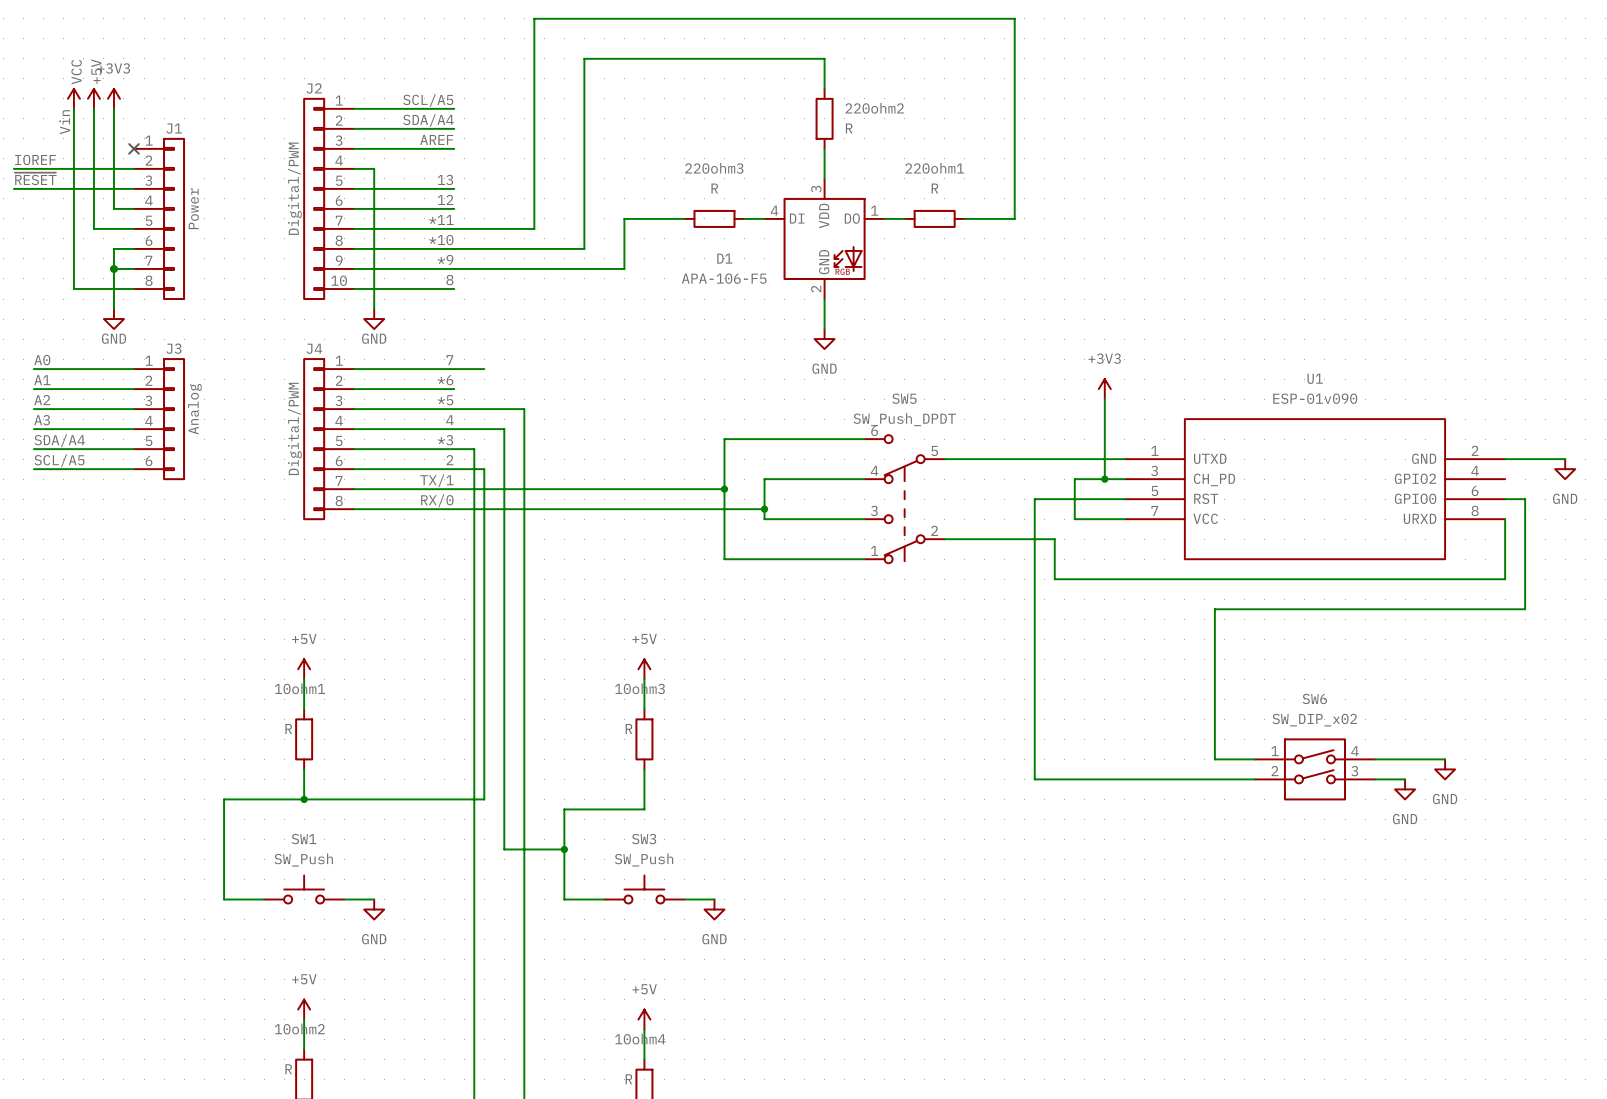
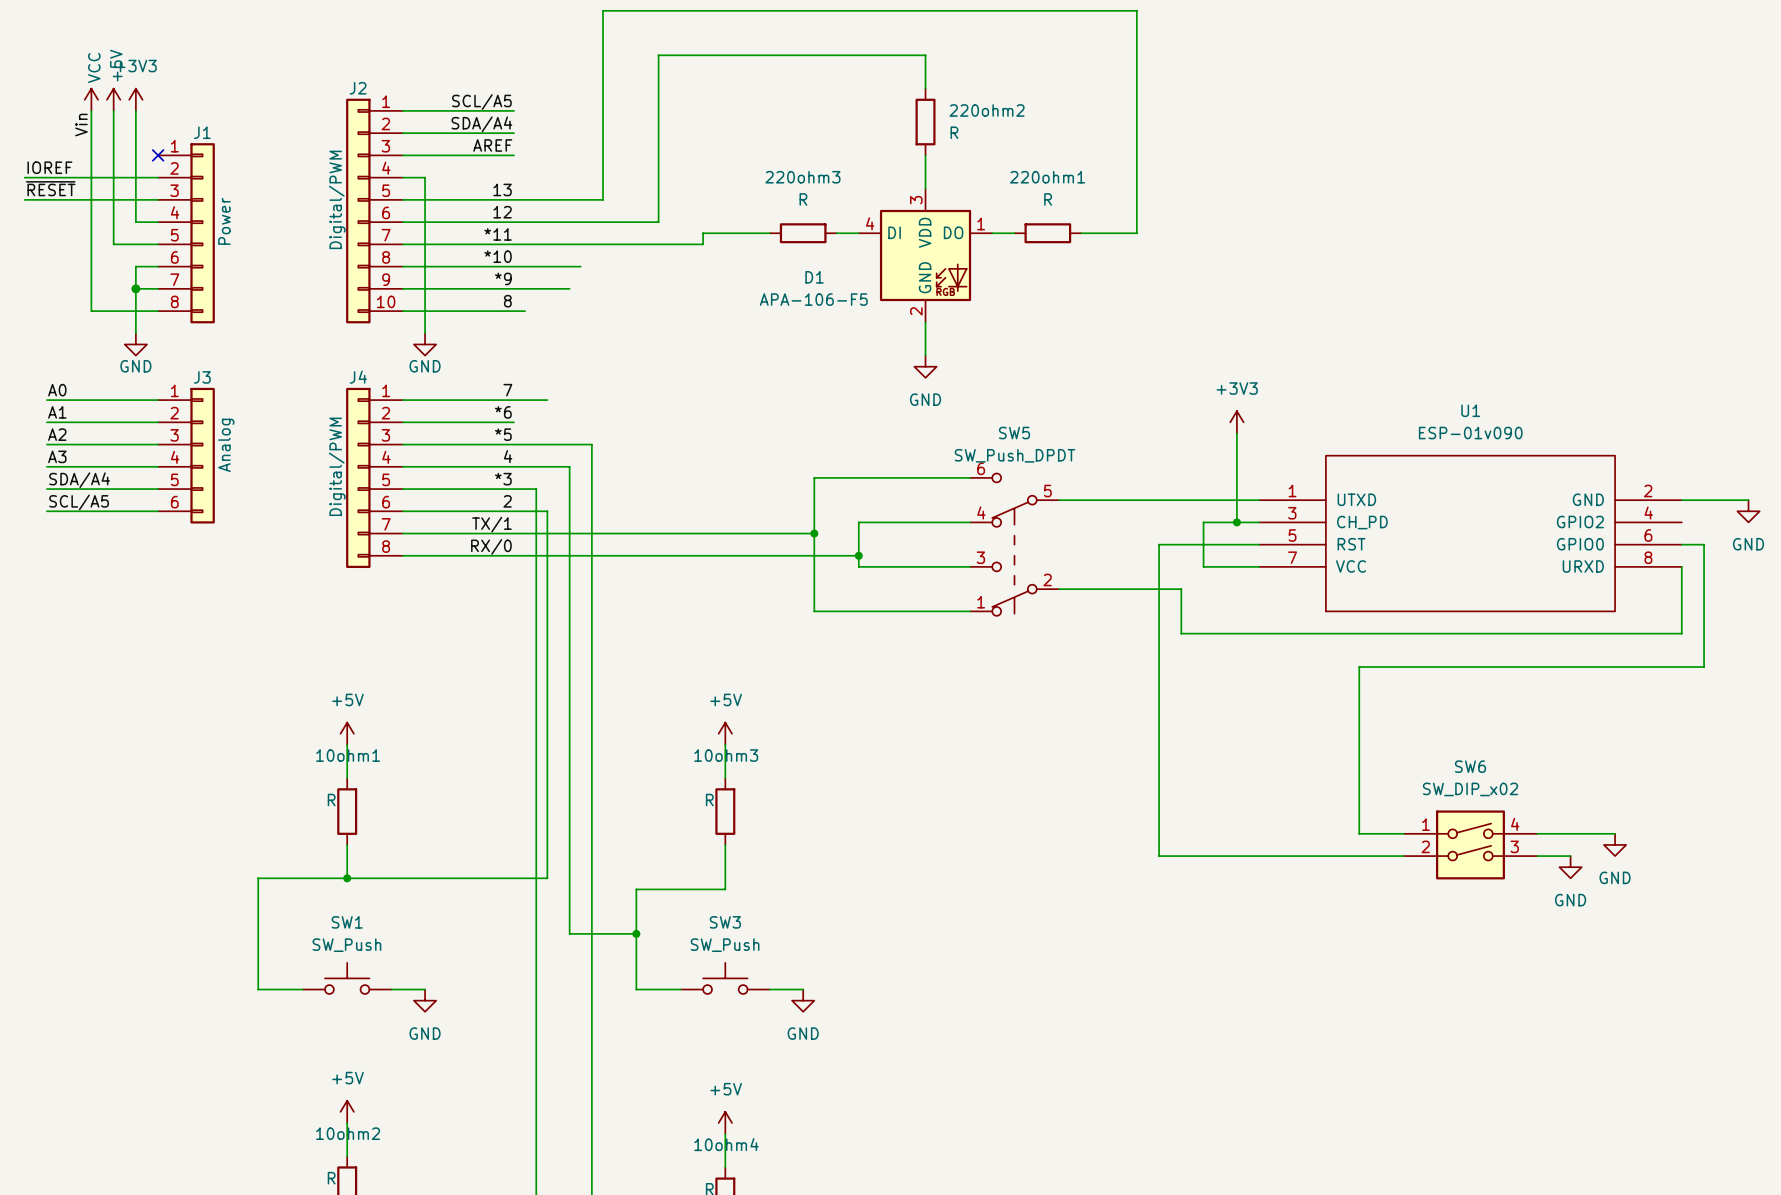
wire: (534, 188) (534, 228) -> (602, 199) (514, 199)
wire: (584, 208) (584, 248) (514, 248) -> (658, 222) (514, 222)
wire: (624, 228) (624, 268) (504, 268) -> (703, 244) (602, 244)
wire: none -> (514, 311) (525, 311)

